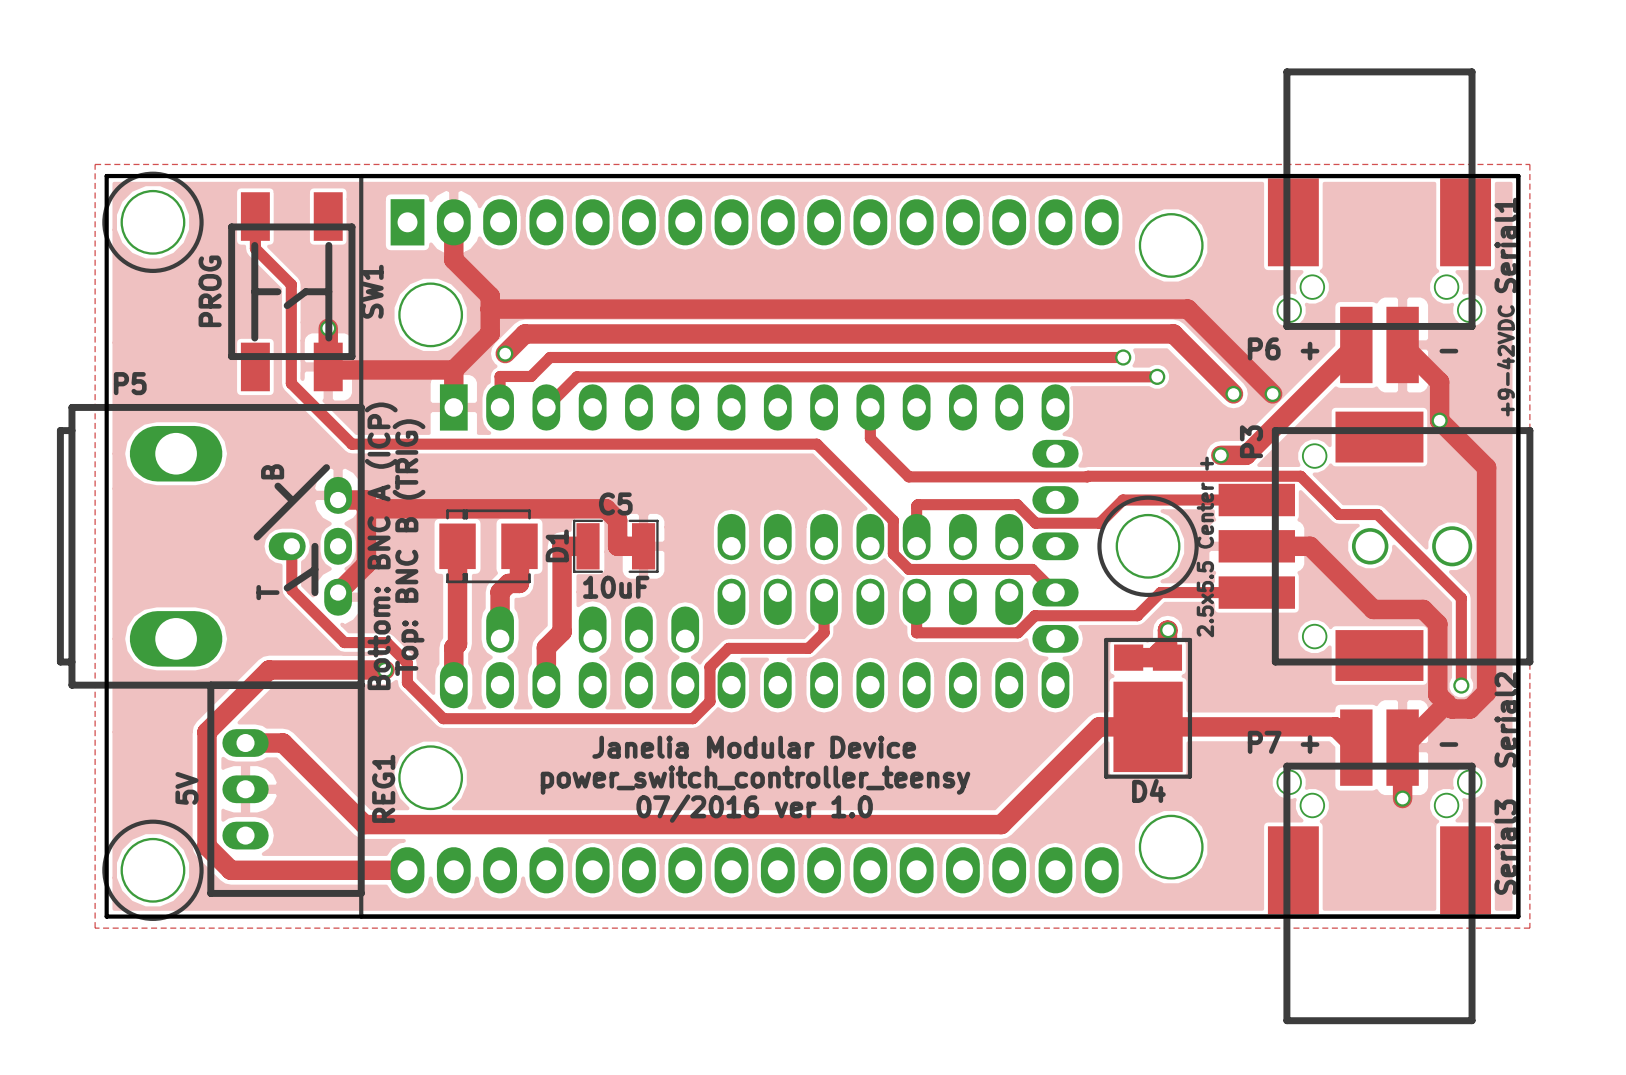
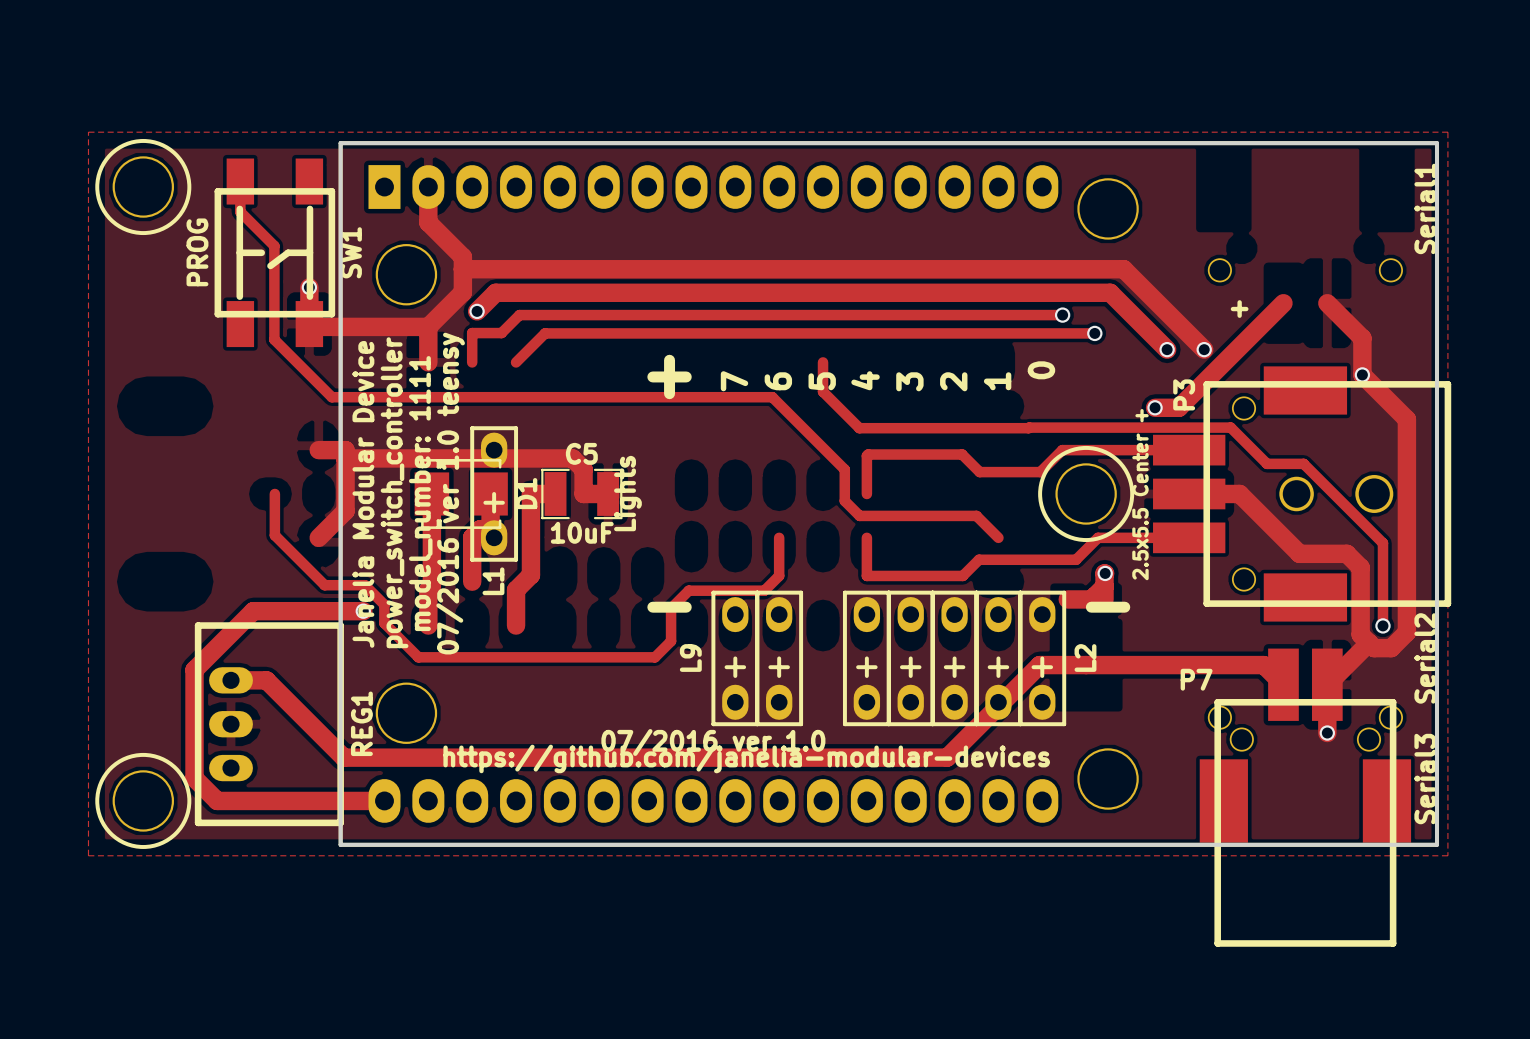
board edge: (361, 176) (106, 176) (106, 916) (361, 916) -> (340, 143) (340, 844)
P6: (1379, 225) -> none
text: - (1448, 351) -> none
text: +9-42VDC (1505, 360) -> none
text: none -> 0 (1041, 370)
text: none -> + (669, 376)
text: none -> 4 (865, 380)
text: none -> 7 (734, 381)
text: none -> 6 (778, 381)
text: none -> 5 (822, 381)
text: none -> 3 (909, 381)
text: none -> 2 (953, 381)
text: none -> 1 (997, 381)
text: none -> power_switch_controller (394, 492)
text: none -> model_number: 1111 (420, 493)
text: none -> 07/2016 ver 1.0 teensy (450, 493)
text: none -> Lights (627, 493)
P5: (210, 546) -> none
L1: none -> (494, 493)
part: (759, 546) -> none
text: none -> - (669, 607)
text: none -> - (1108, 607)
D4: (1148, 708) -> none
L9: none -> (735, 658)
part: none -> (779, 658)
part: none -> (866, 658)
part: none -> (910, 658)
part: none -> (954, 658)
part: none -> (998, 658)
L2: none -> (1042, 658)
text: + (1310, 744) -> none
text: - (1448, 744) -> none
text rotation: 0° (754, 747) -> 90° counterclockwise (363, 494)
text position: Janelia Modular Device (754, 747) -> Janelia Modular Device (363, 494)
text: power_switch_controller_teensy (755, 780) -> none
text: 5V (186, 788) -> none
text: none -> https://github.com/janelia-modular-devices (746, 758)

